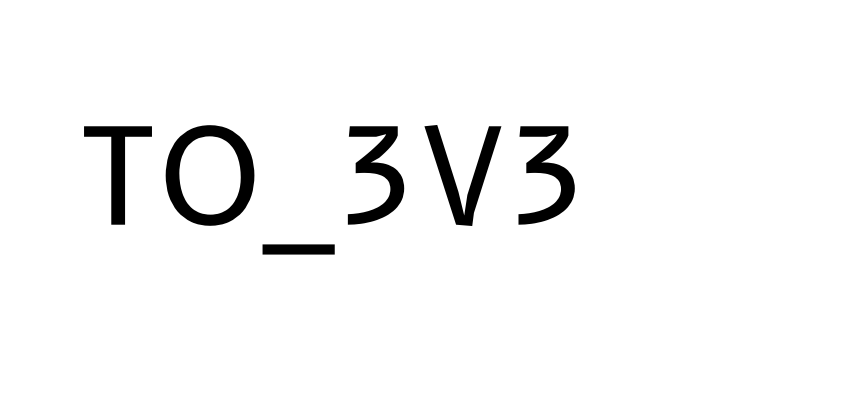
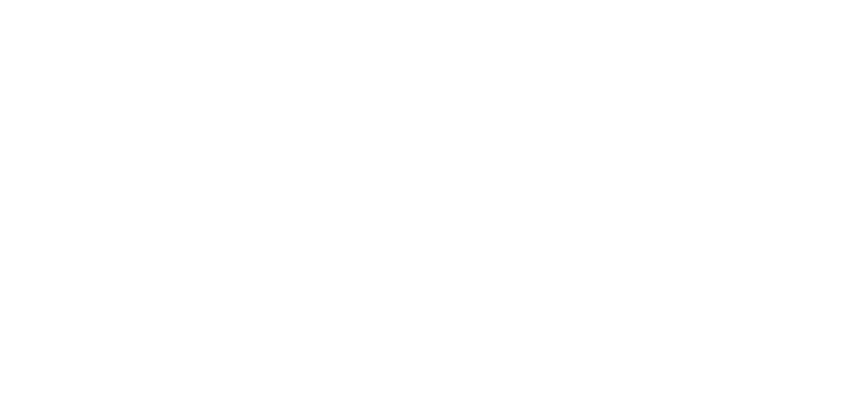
label: TO_3V3 (329, 189) -> none

